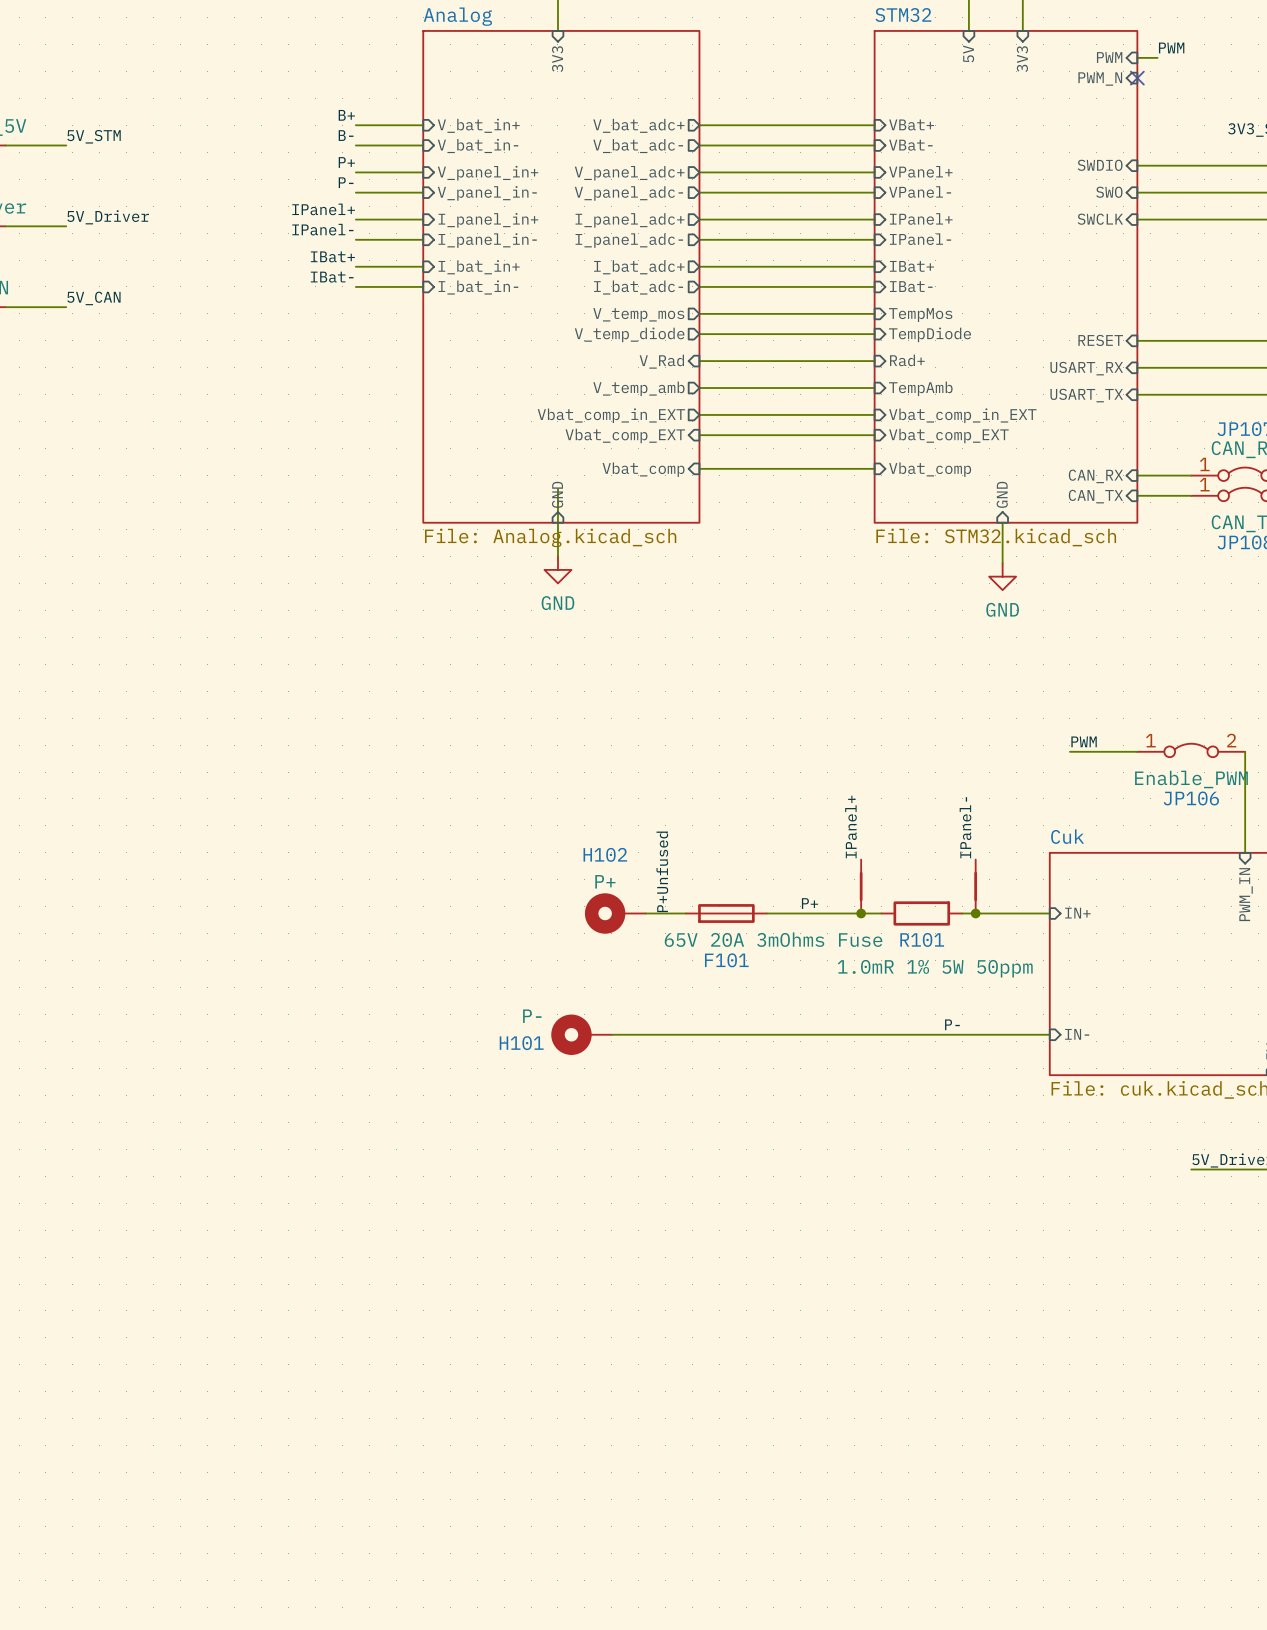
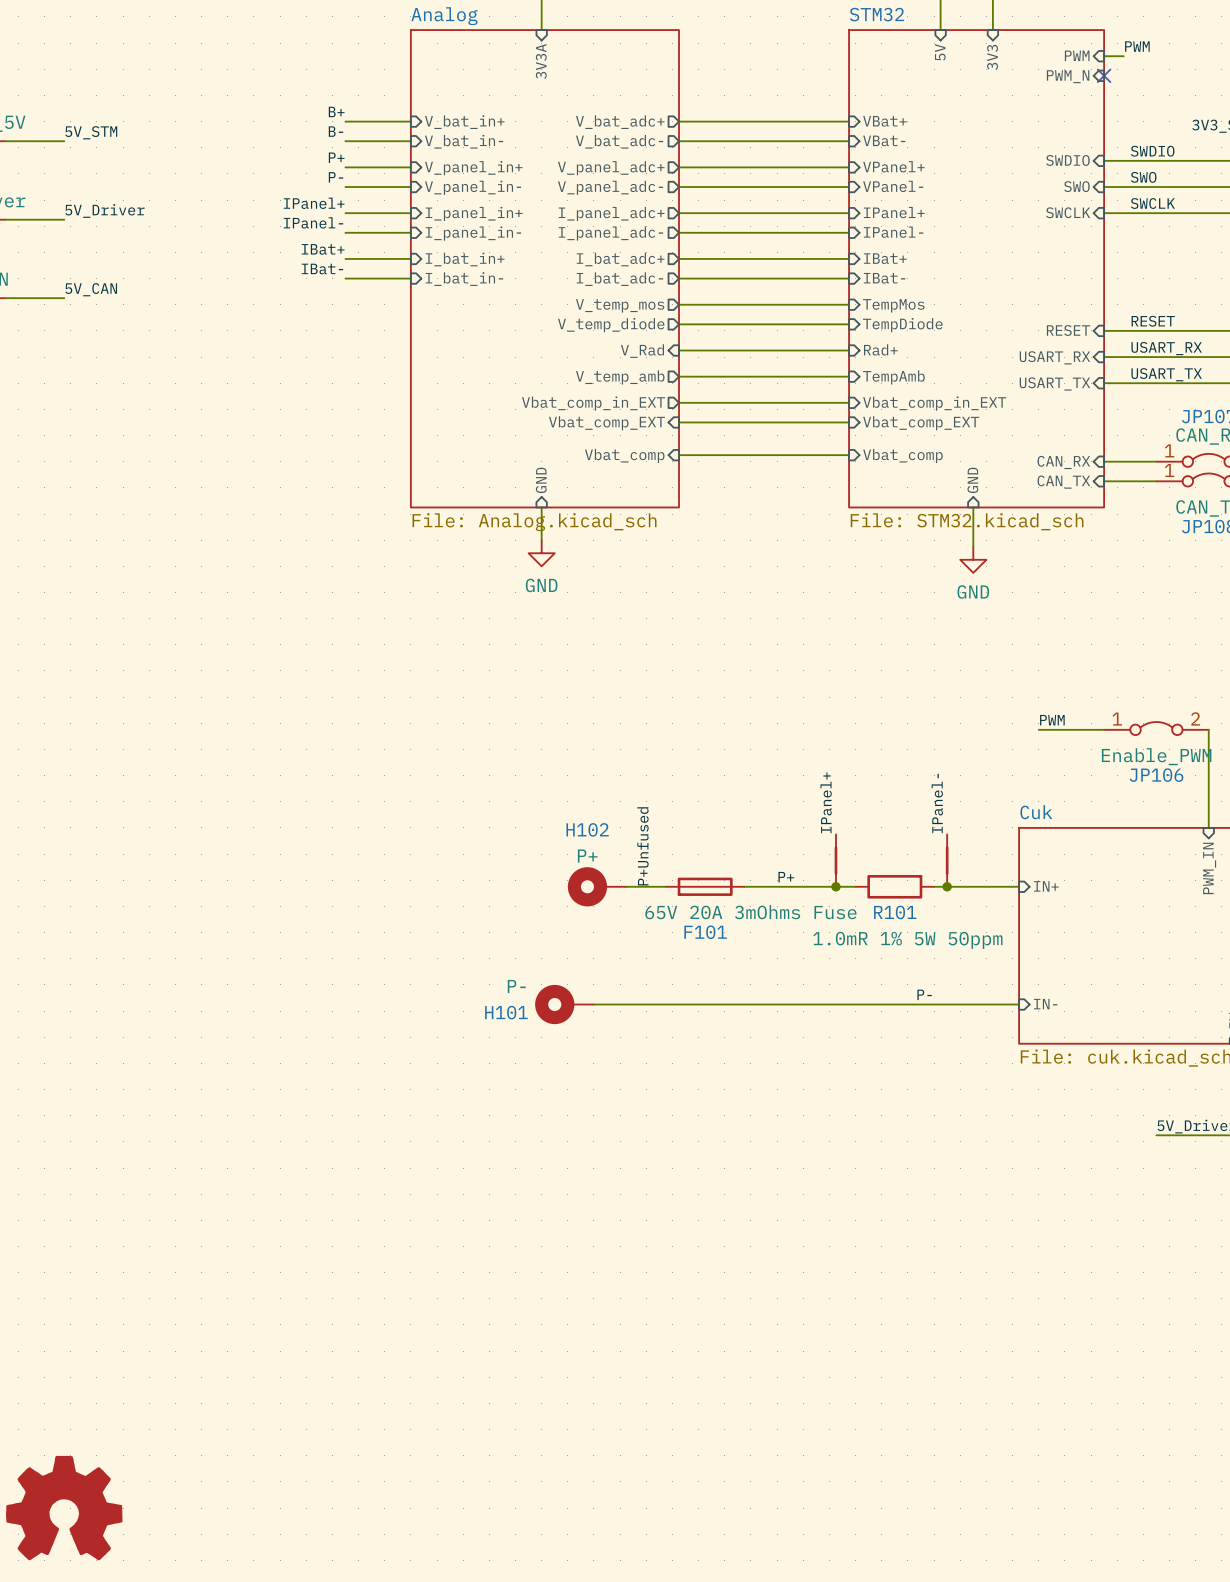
sheet pin: 3V3 (557, 59) -> 3V3A (541, 61)
label: none -> SWDIO (1152, 151)
label: none -> SWO (1143, 177)
label: none -> SWCLK (1152, 203)
label: none -> RESET (1153, 321)
label: none -> USART_RX (1166, 348)
label: none -> USART_TX (1166, 374)
wire: (557, 489) (557, 522) -> none
part: none -> (64, 1508)

